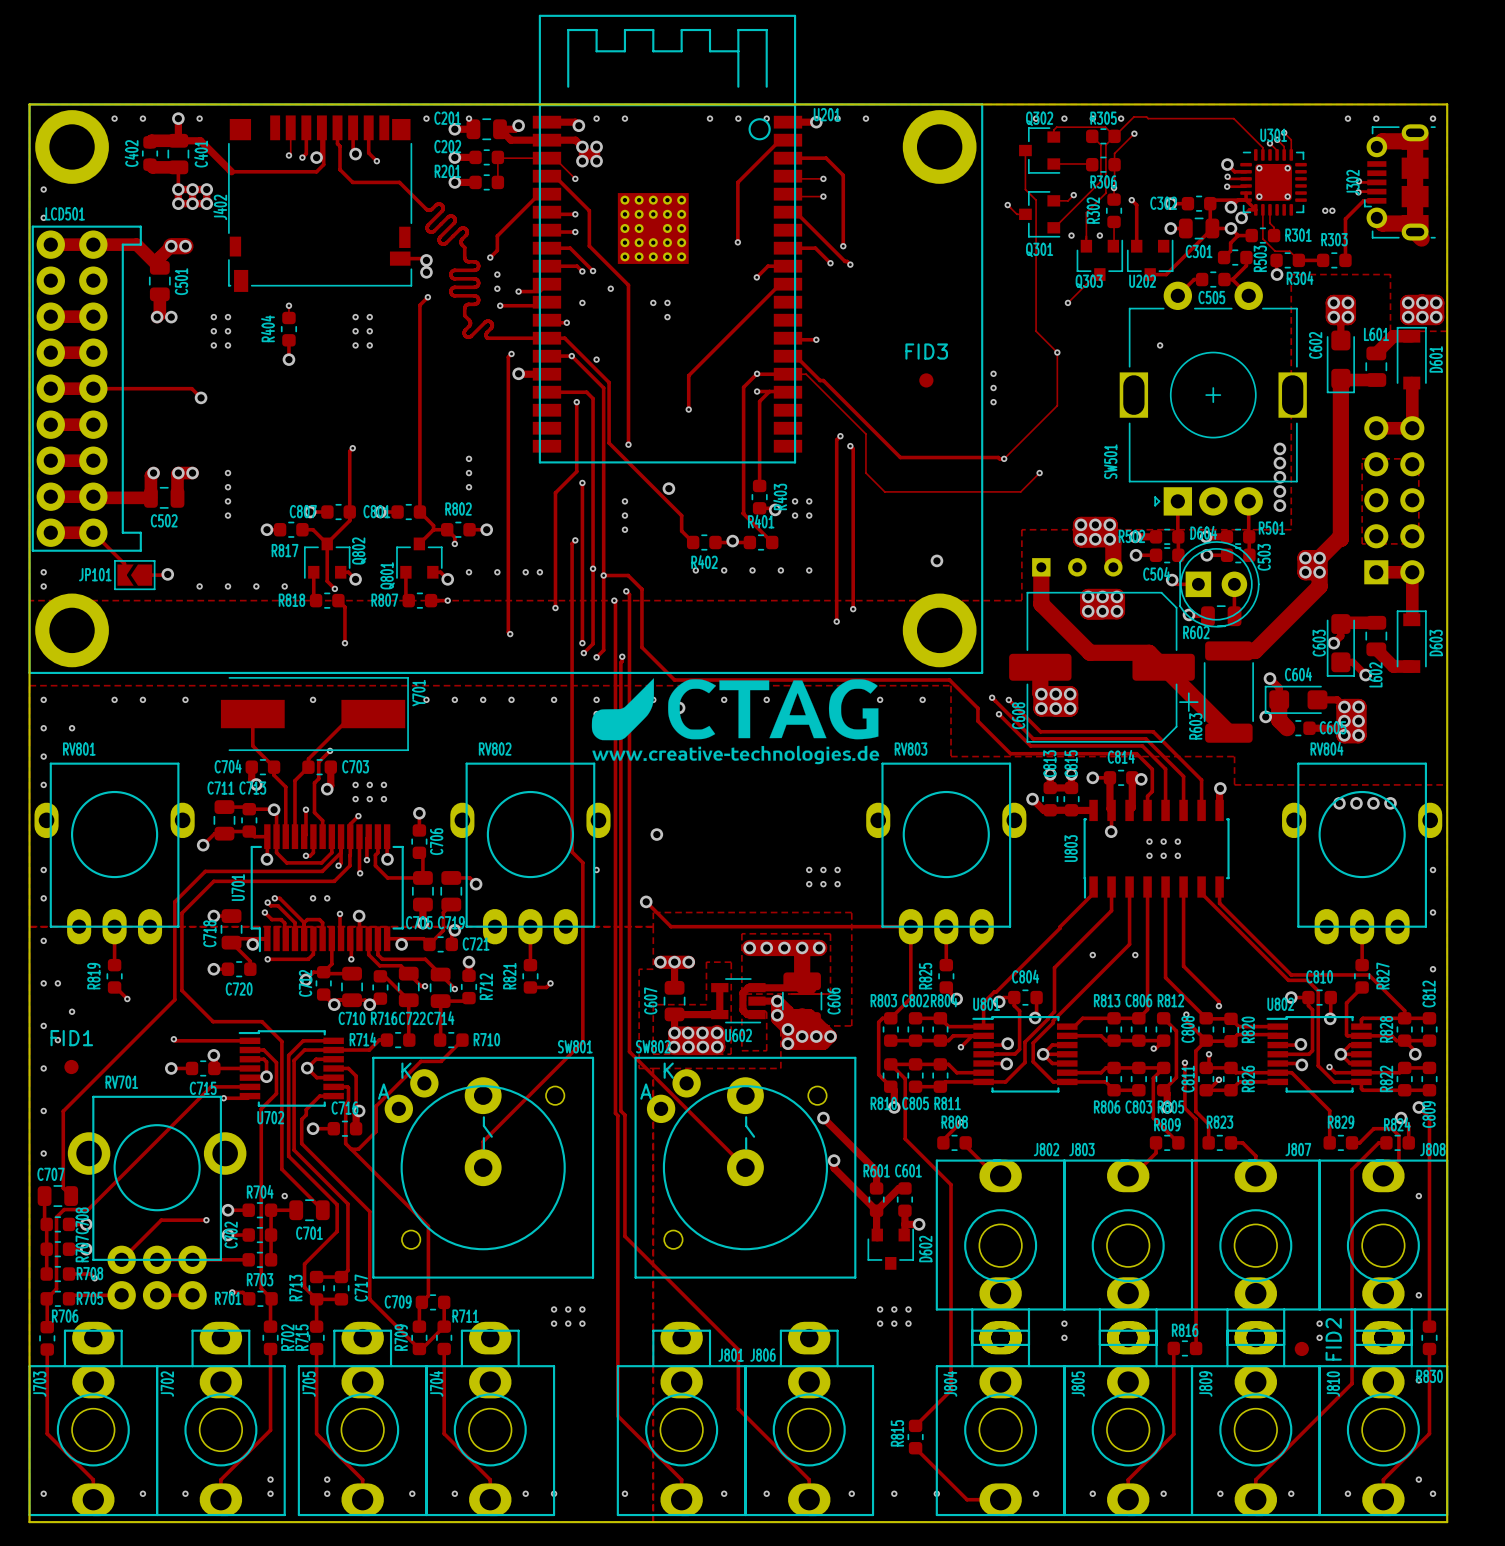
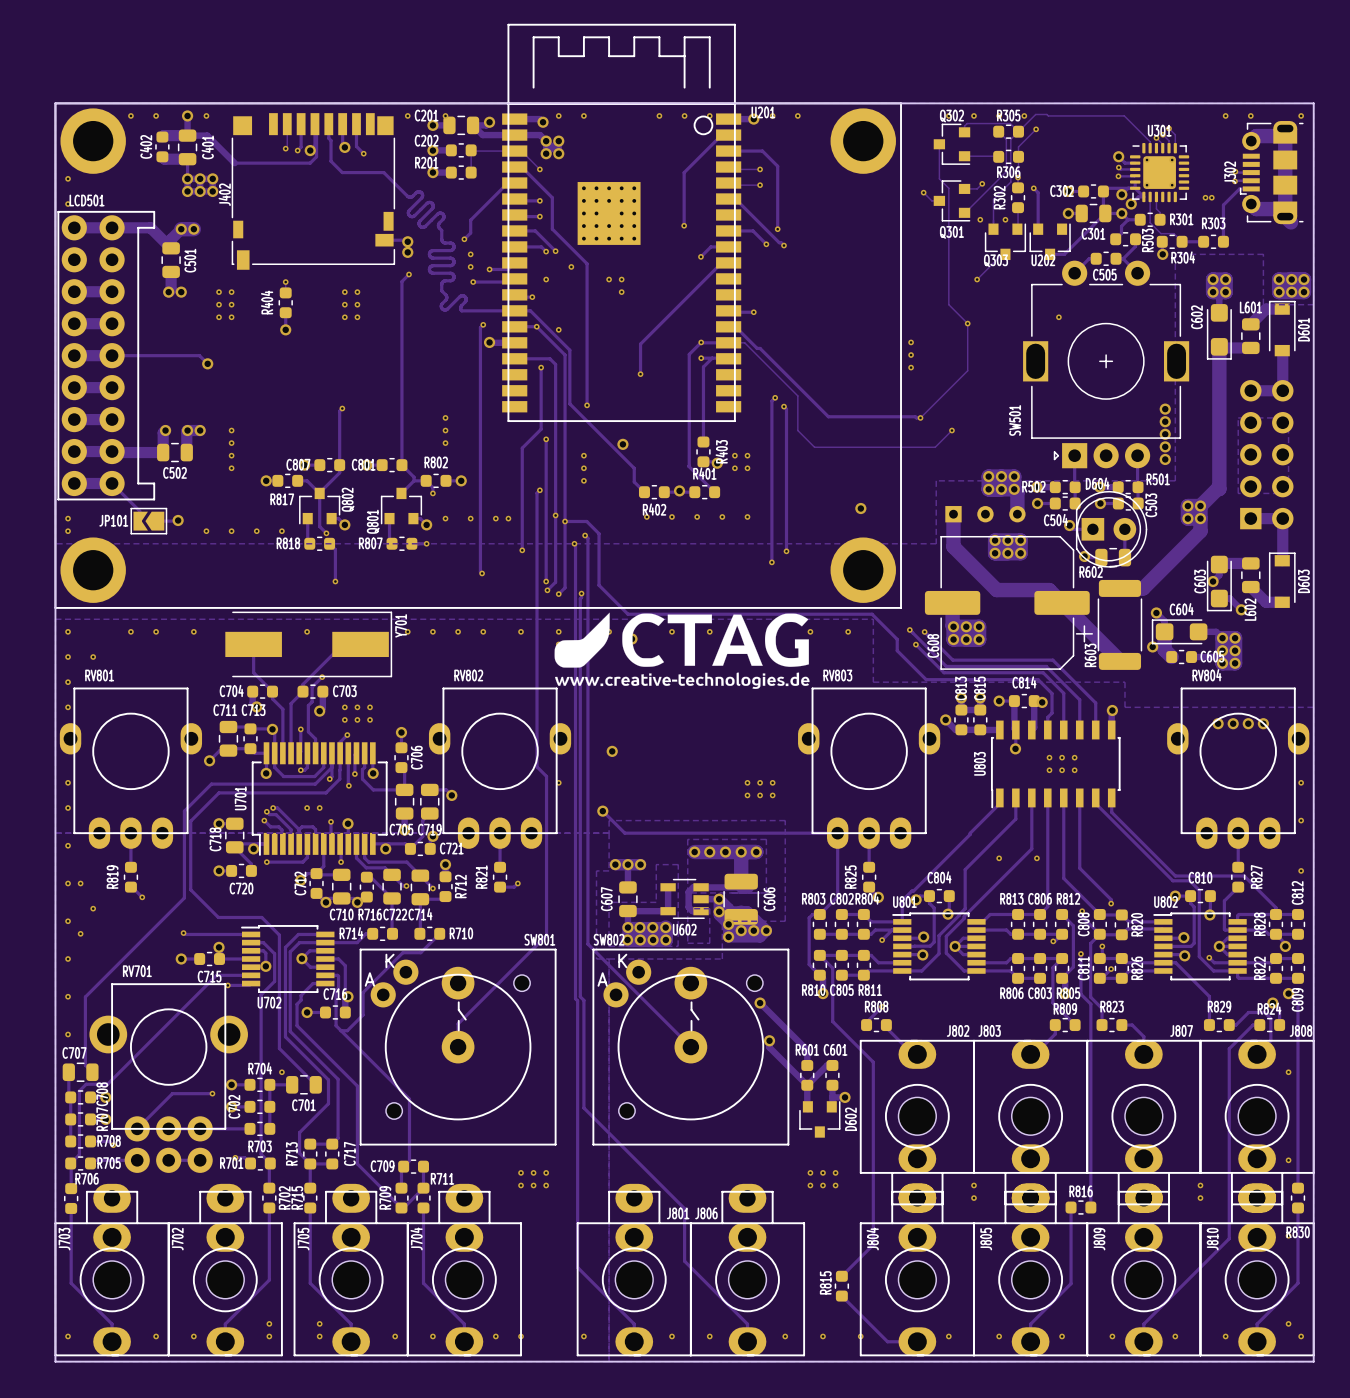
FID3: (926, 380) -> none
FID1: (71, 1067) -> none
FID2: (1301, 1348) -> none

